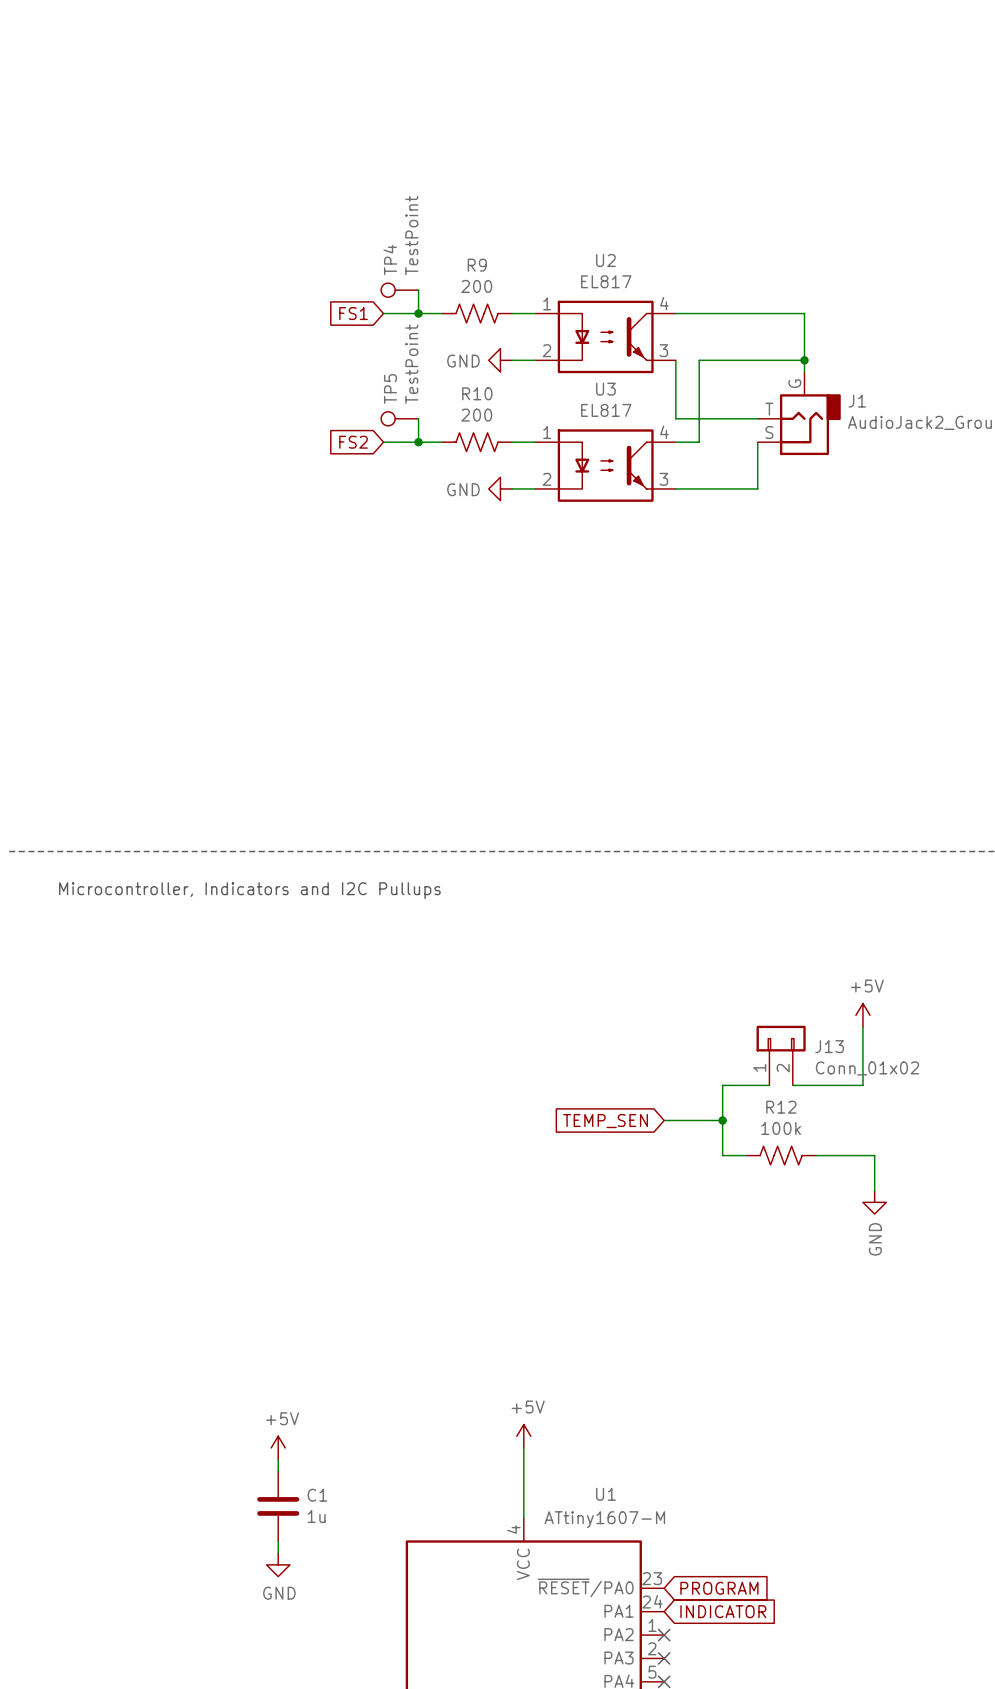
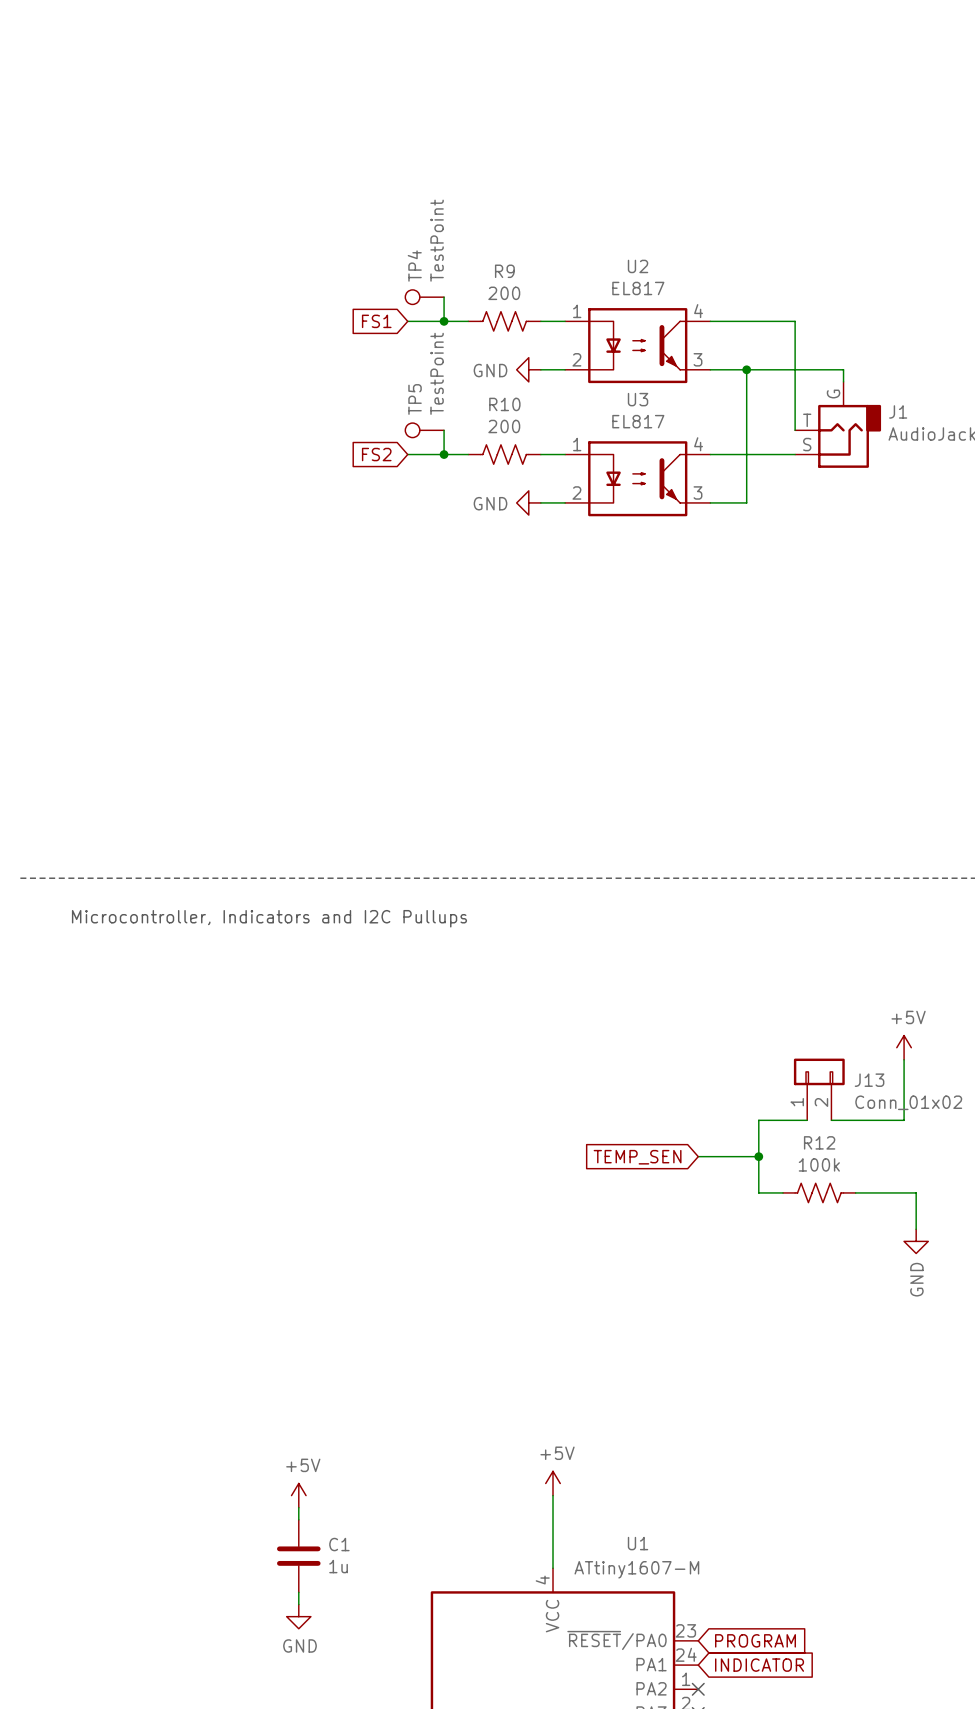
wire: (757, 313) (804, 313) (804, 360) -> (795, 321) (795, 430)
wire: (675, 360) (675, 418) (757, 418) -> (710, 369) (734, 369)
wire: (699, 360) (699, 442) -> none
wire: none -> (746, 369) (746, 502)
junction: none -> (746, 369)
junction: (804, 360) -> none
wire: (757, 442) (757, 488) (710, 488) -> (795, 454) (734, 454)

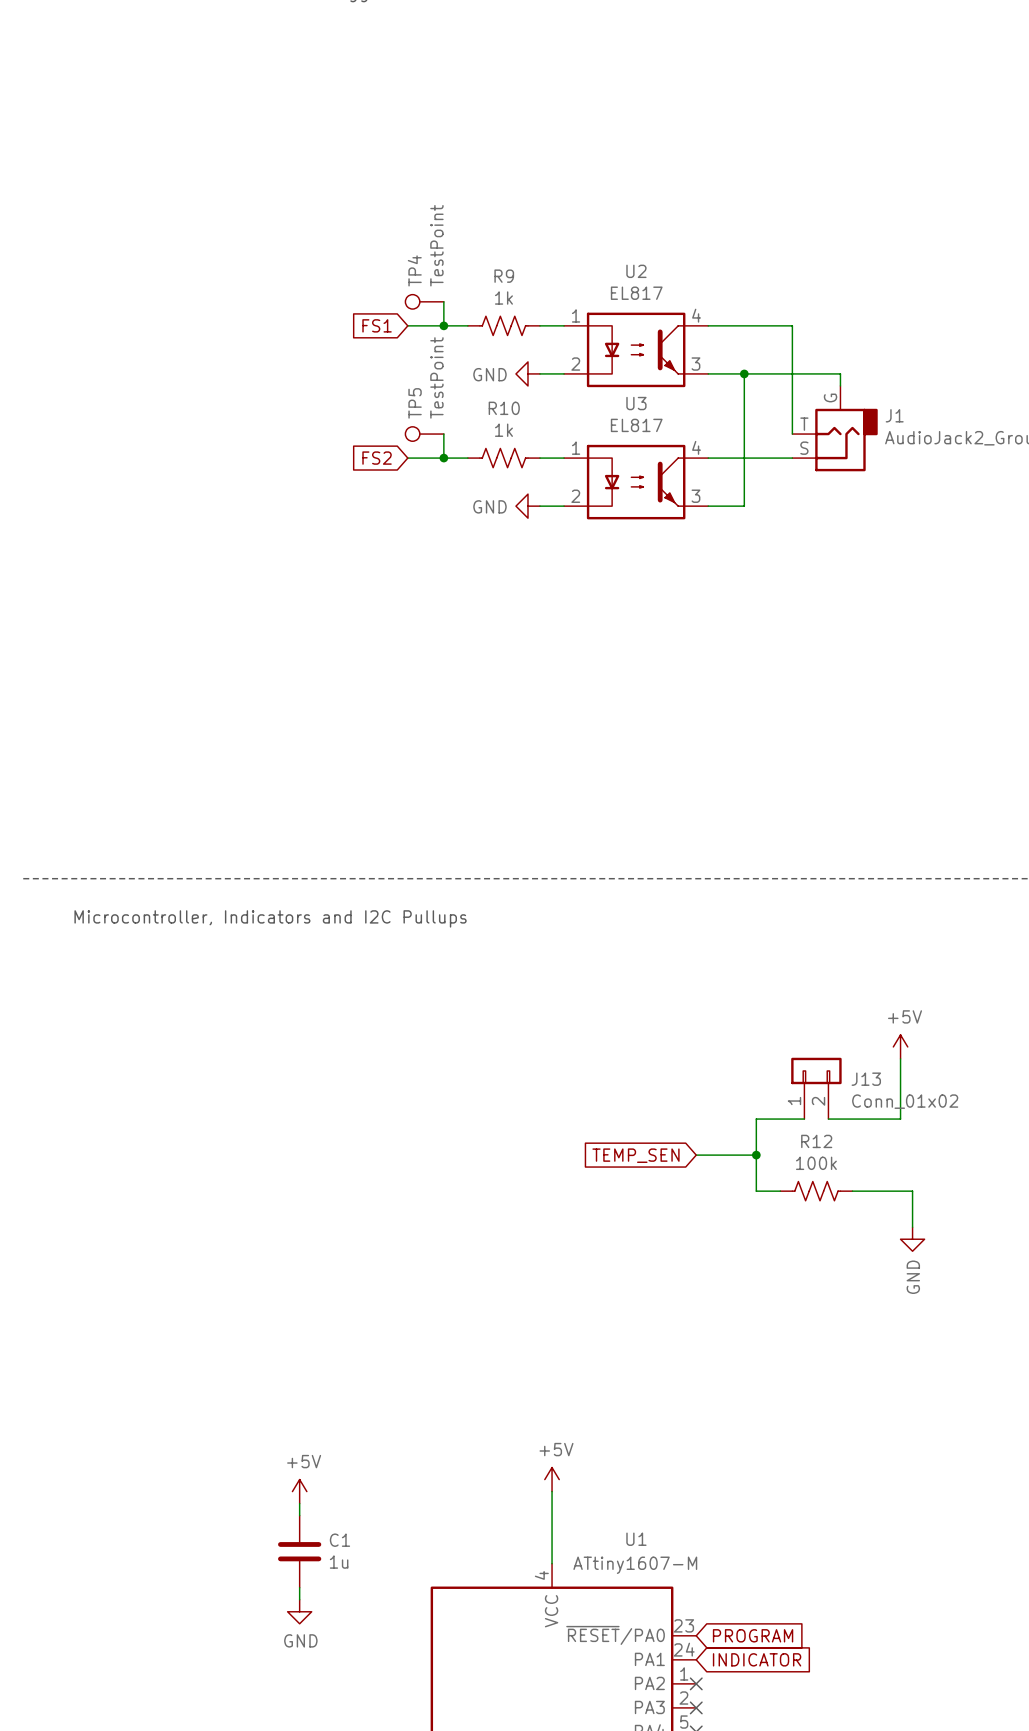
R9 value: 200 (504, 293) -> 1k (503, 298)
R10 value: 200 (504, 426) -> 1k (503, 430)

